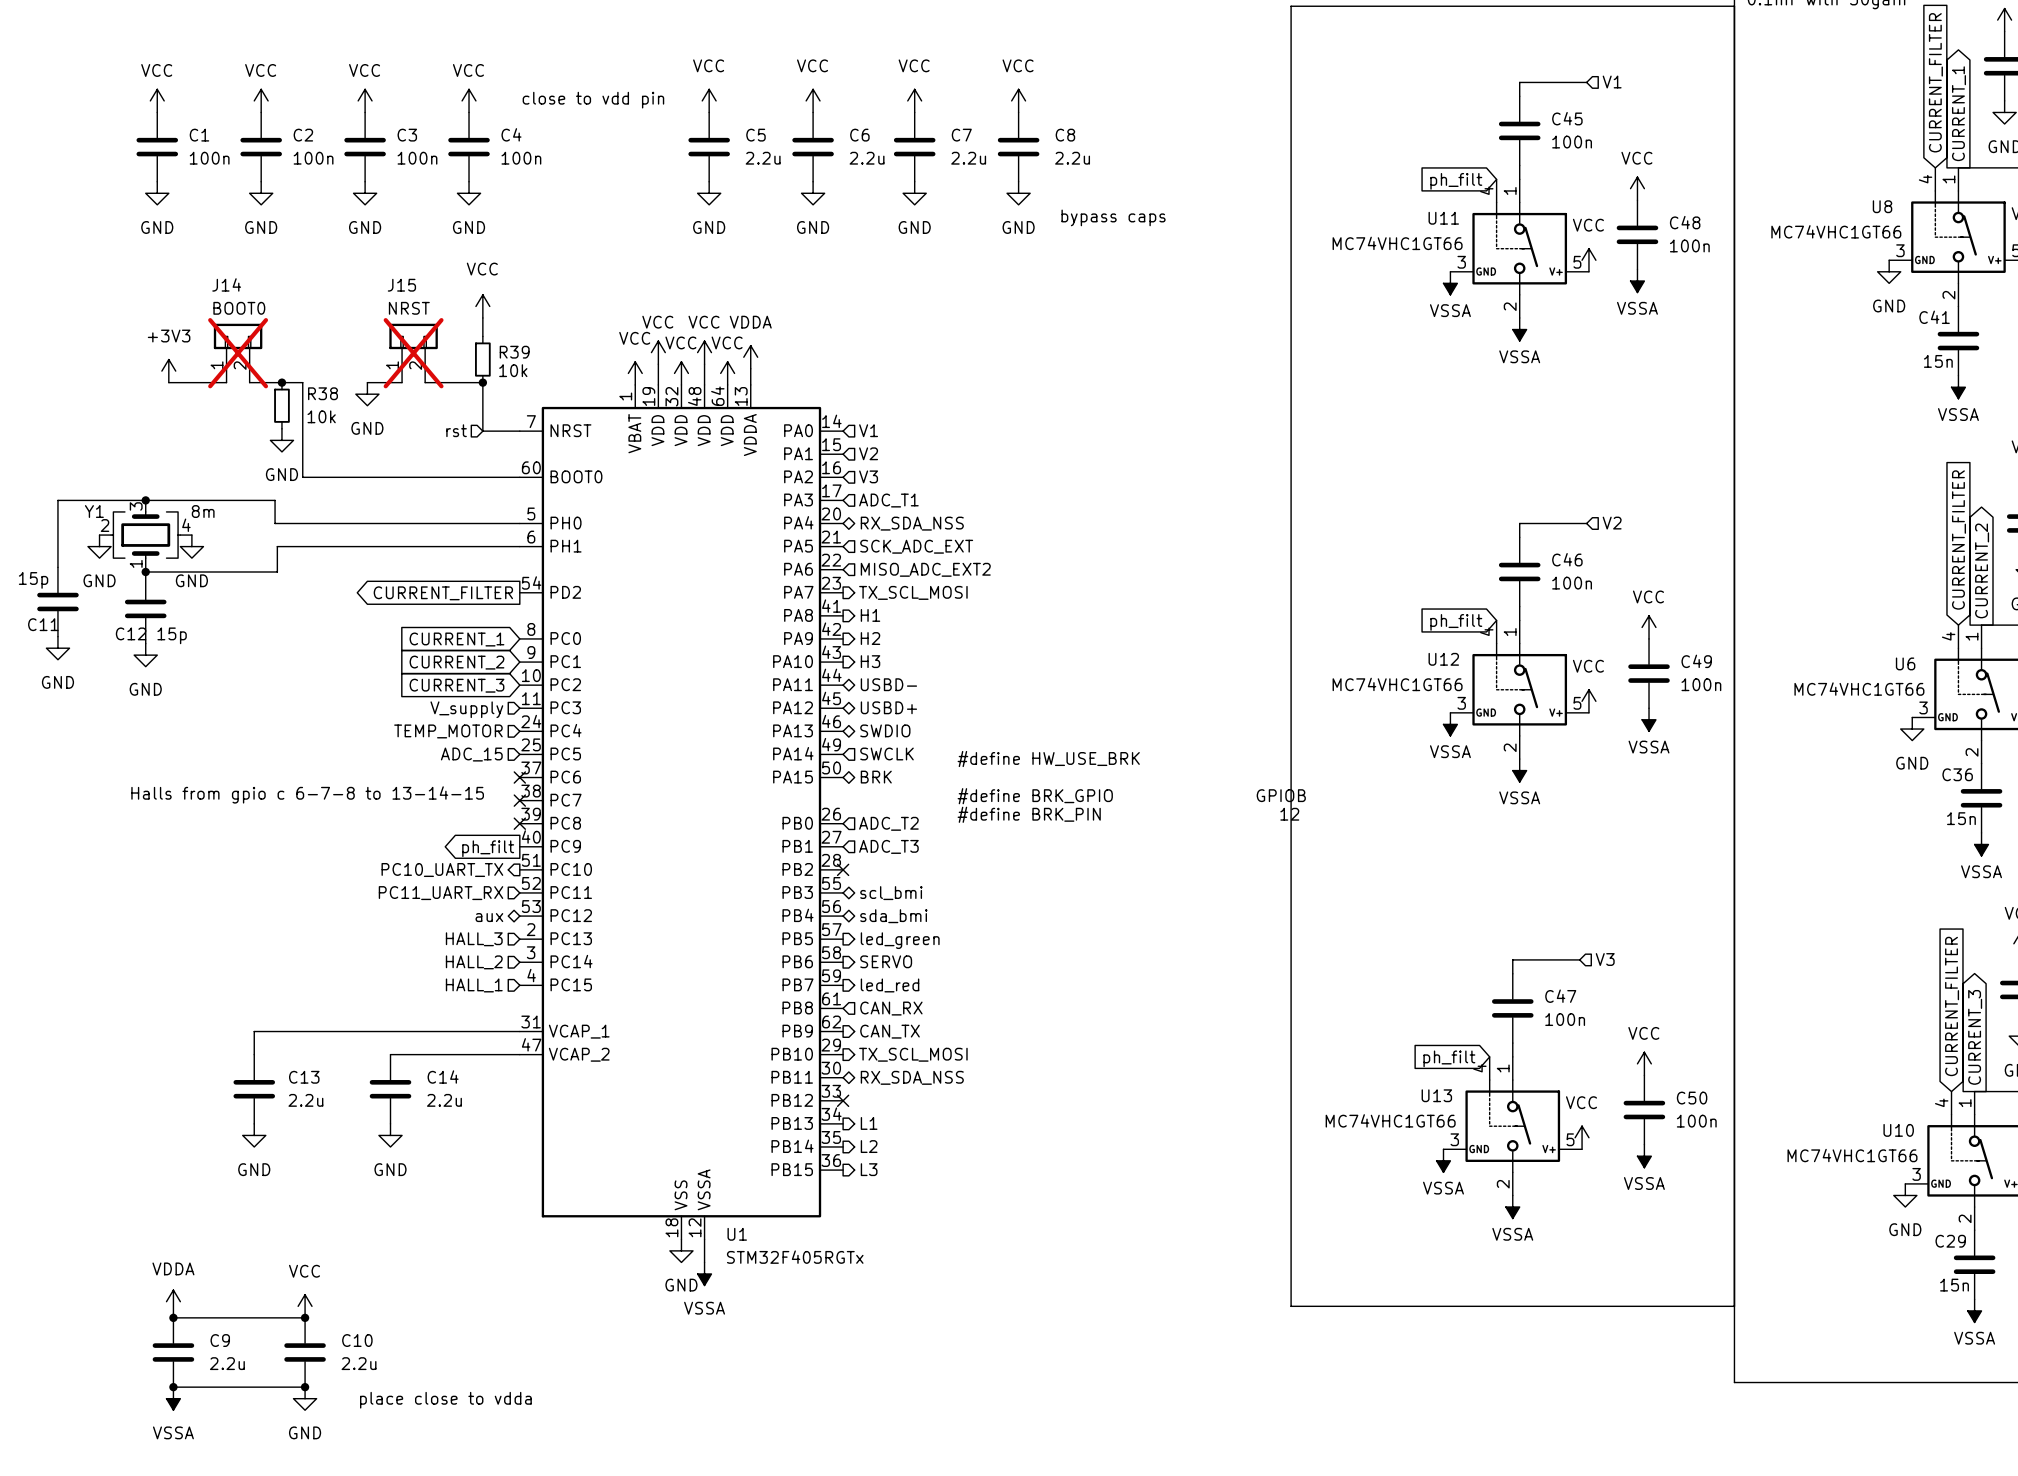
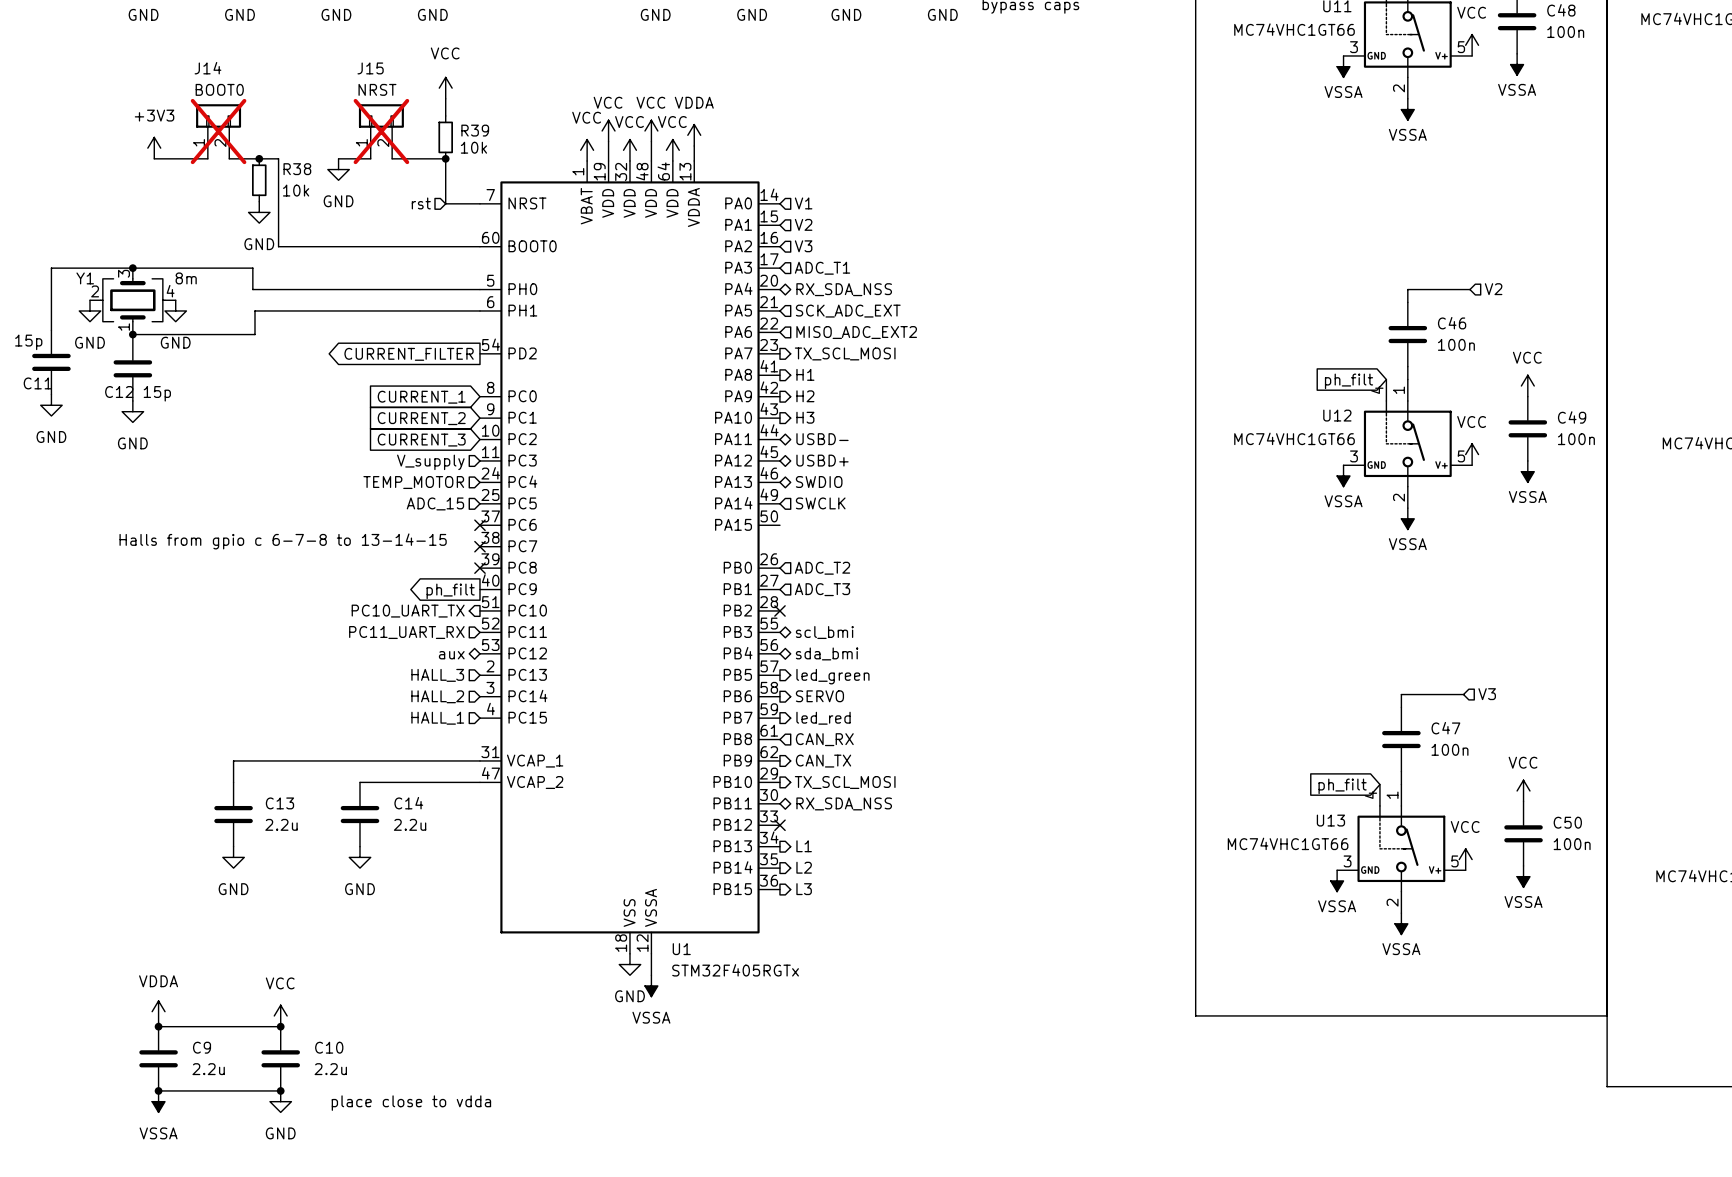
text: #define HW_USE_BRK (1048, 759) -> none
hierarchical label: BRK (876, 777) -> none
text: #define BRK_GPIO GPIOB (1131, 796) -> none
text: #define BRK_PIN 12 (1128, 814) -> none

